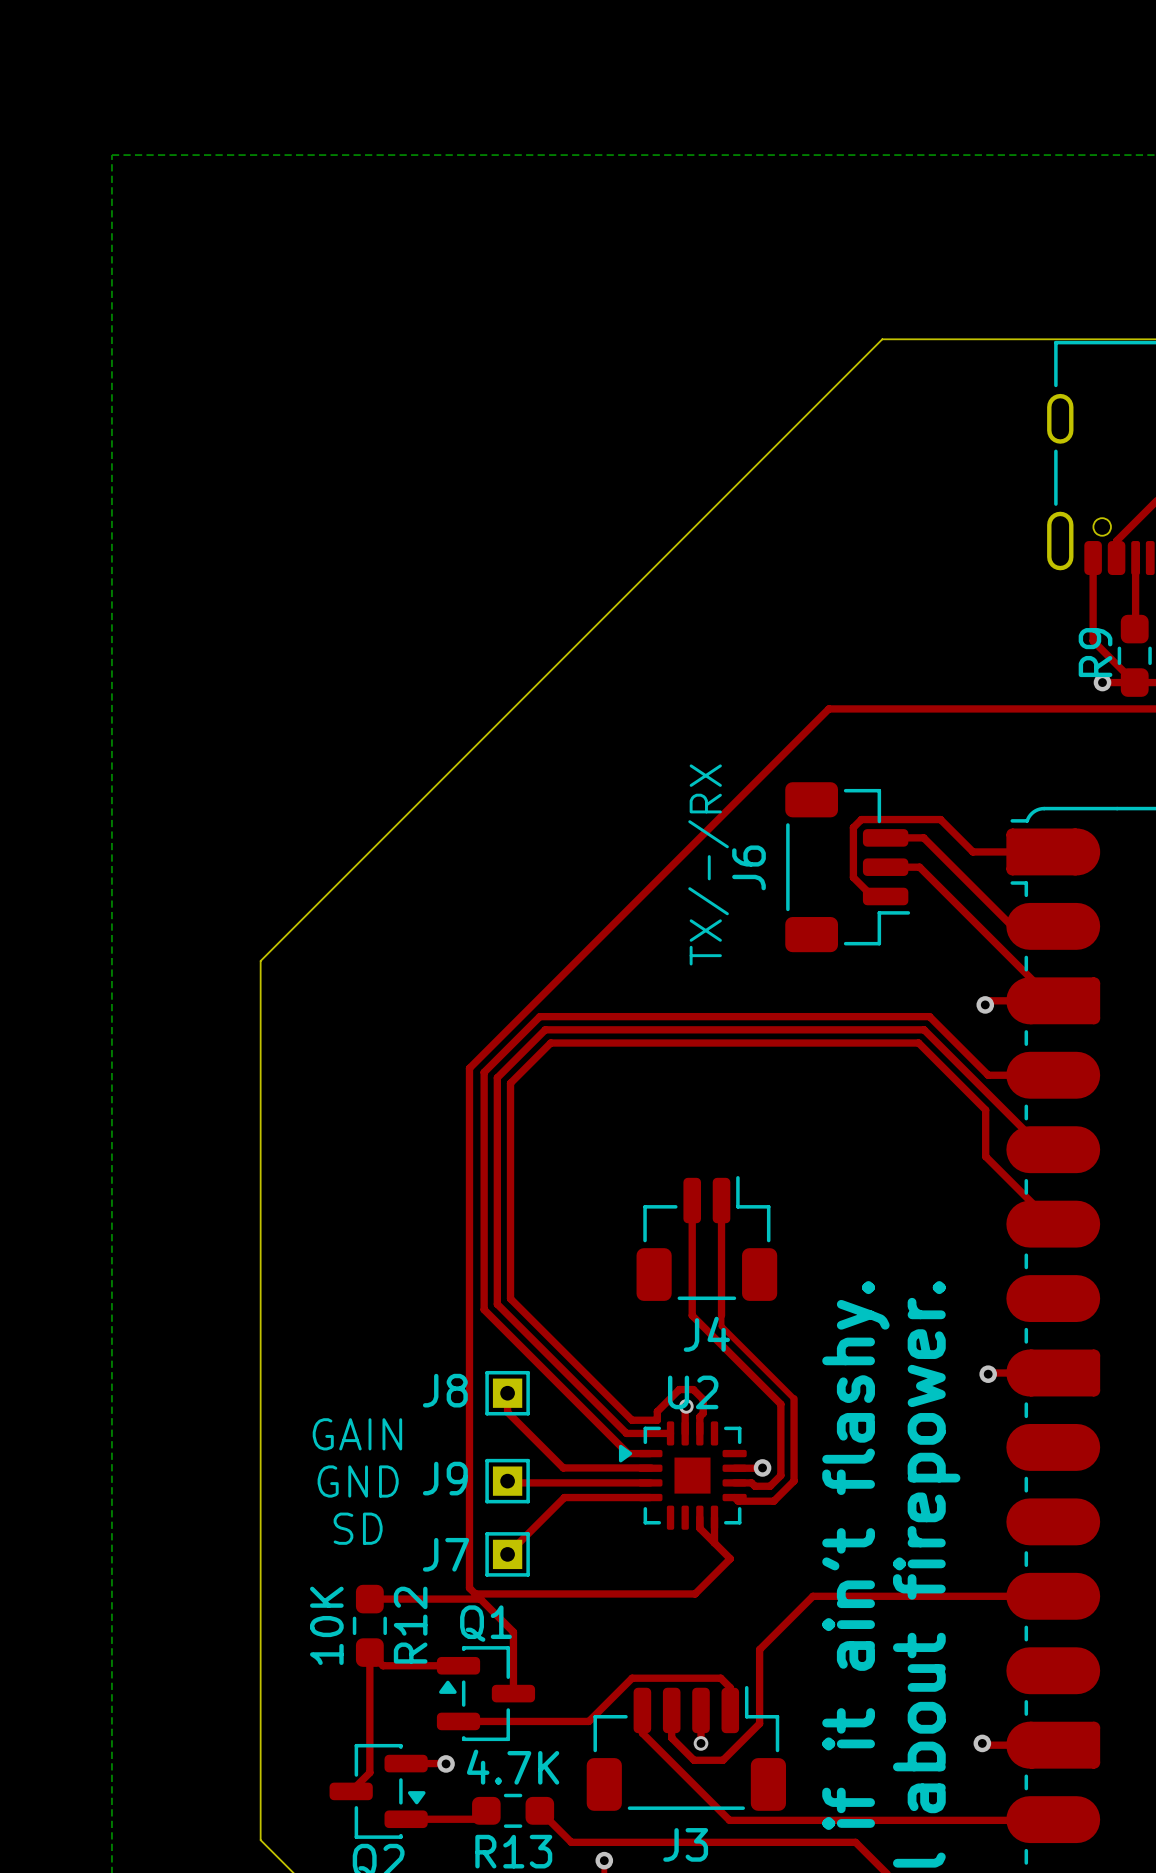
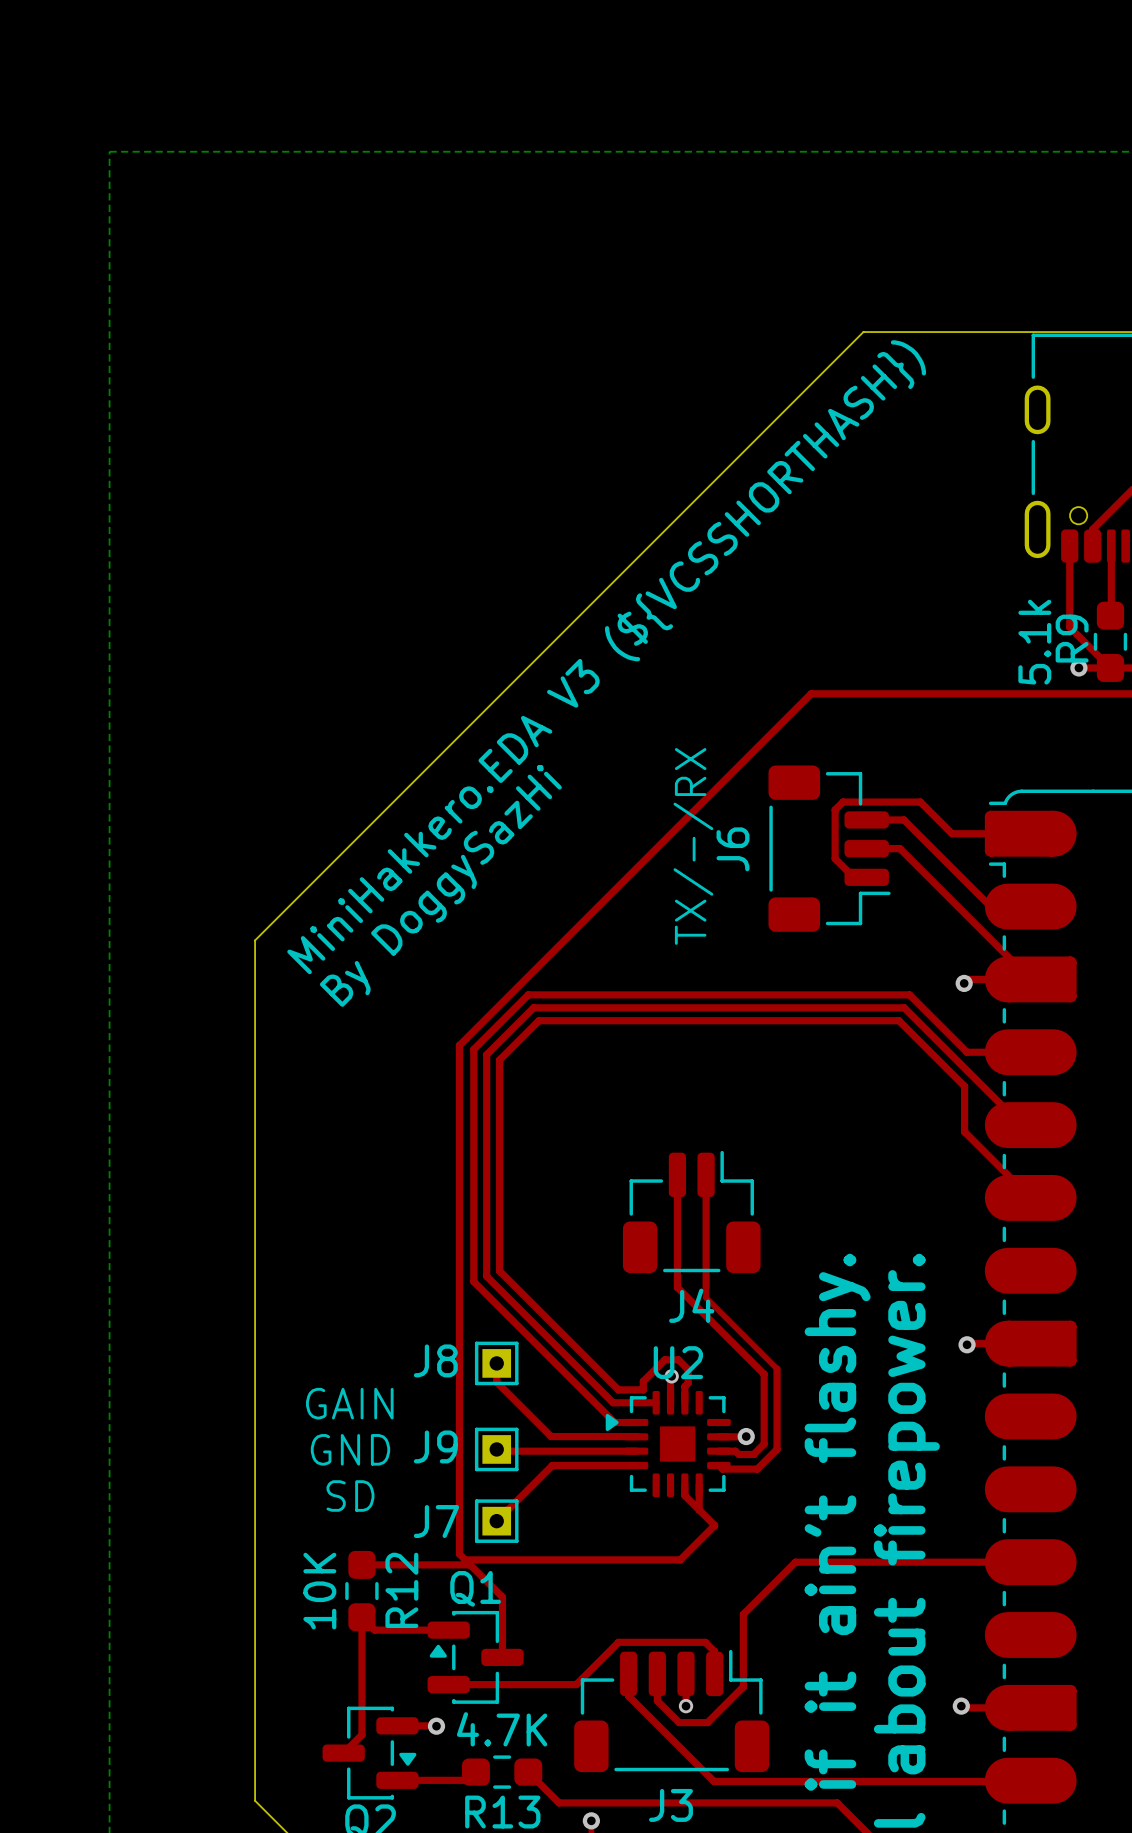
R9 value: none -> 5.1k (1034, 642)
text: none -> MiniHakkero.EDA V3 (${VCSSHORTHASH}) (606, 657)
text: none -> By DoggySazHi (440, 885)

